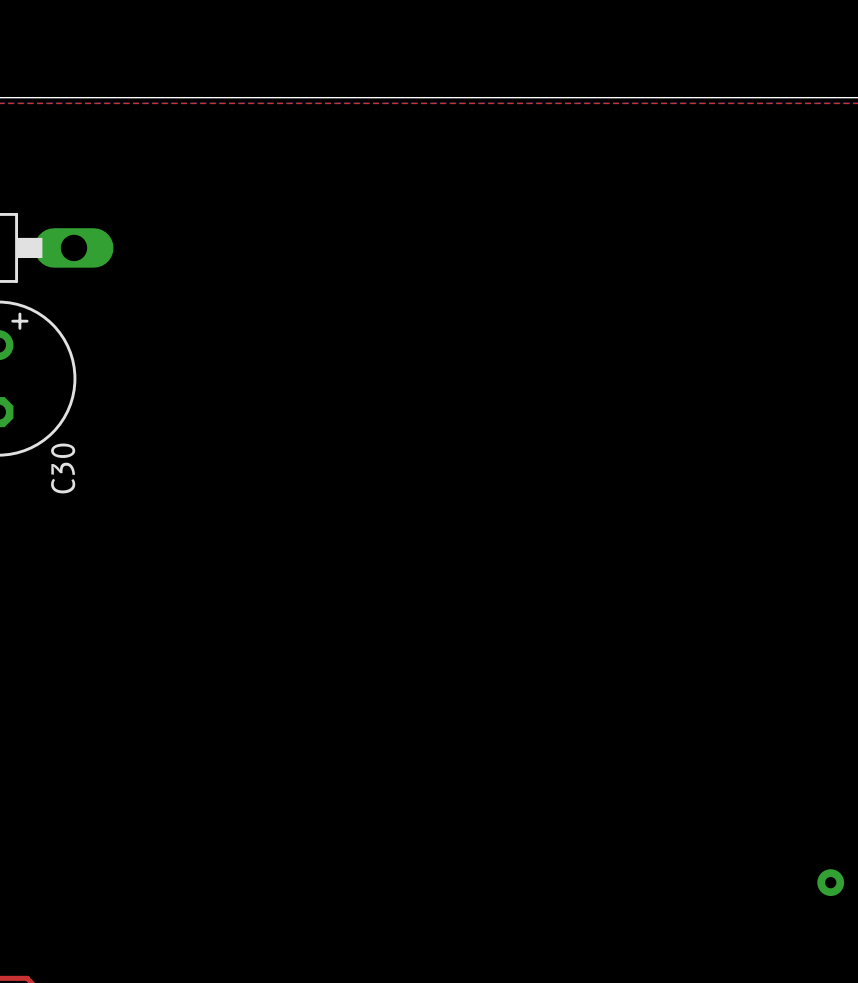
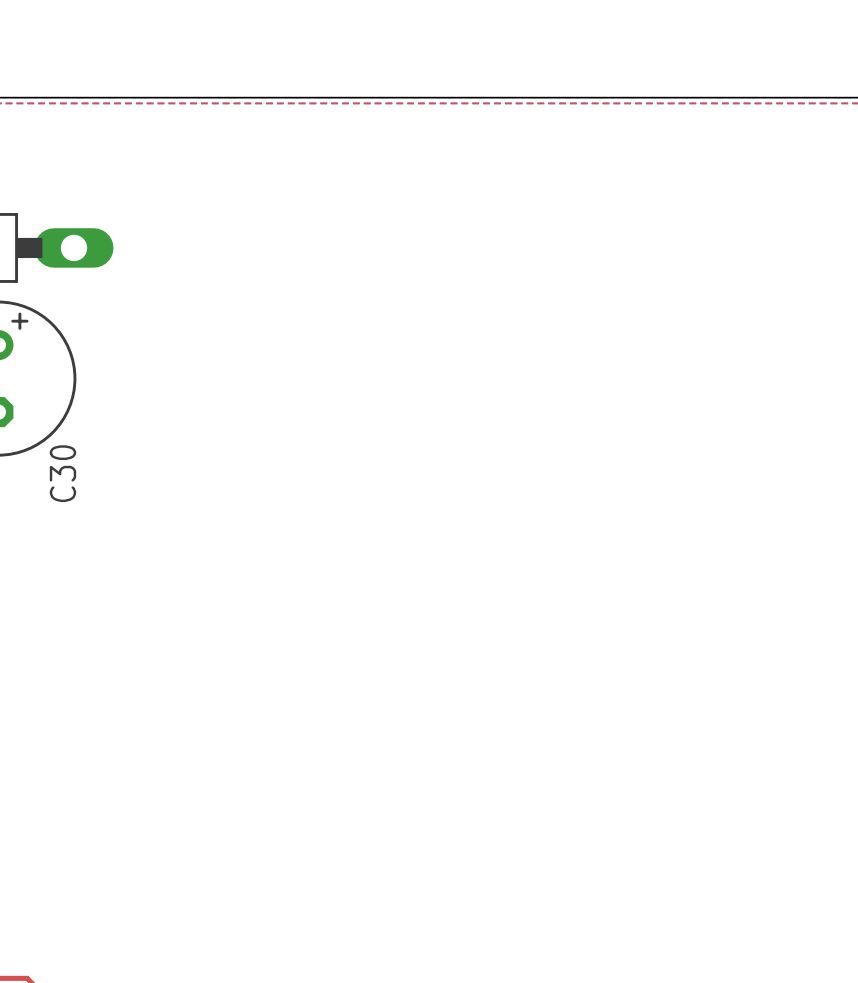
via: (830, 882) -> none

